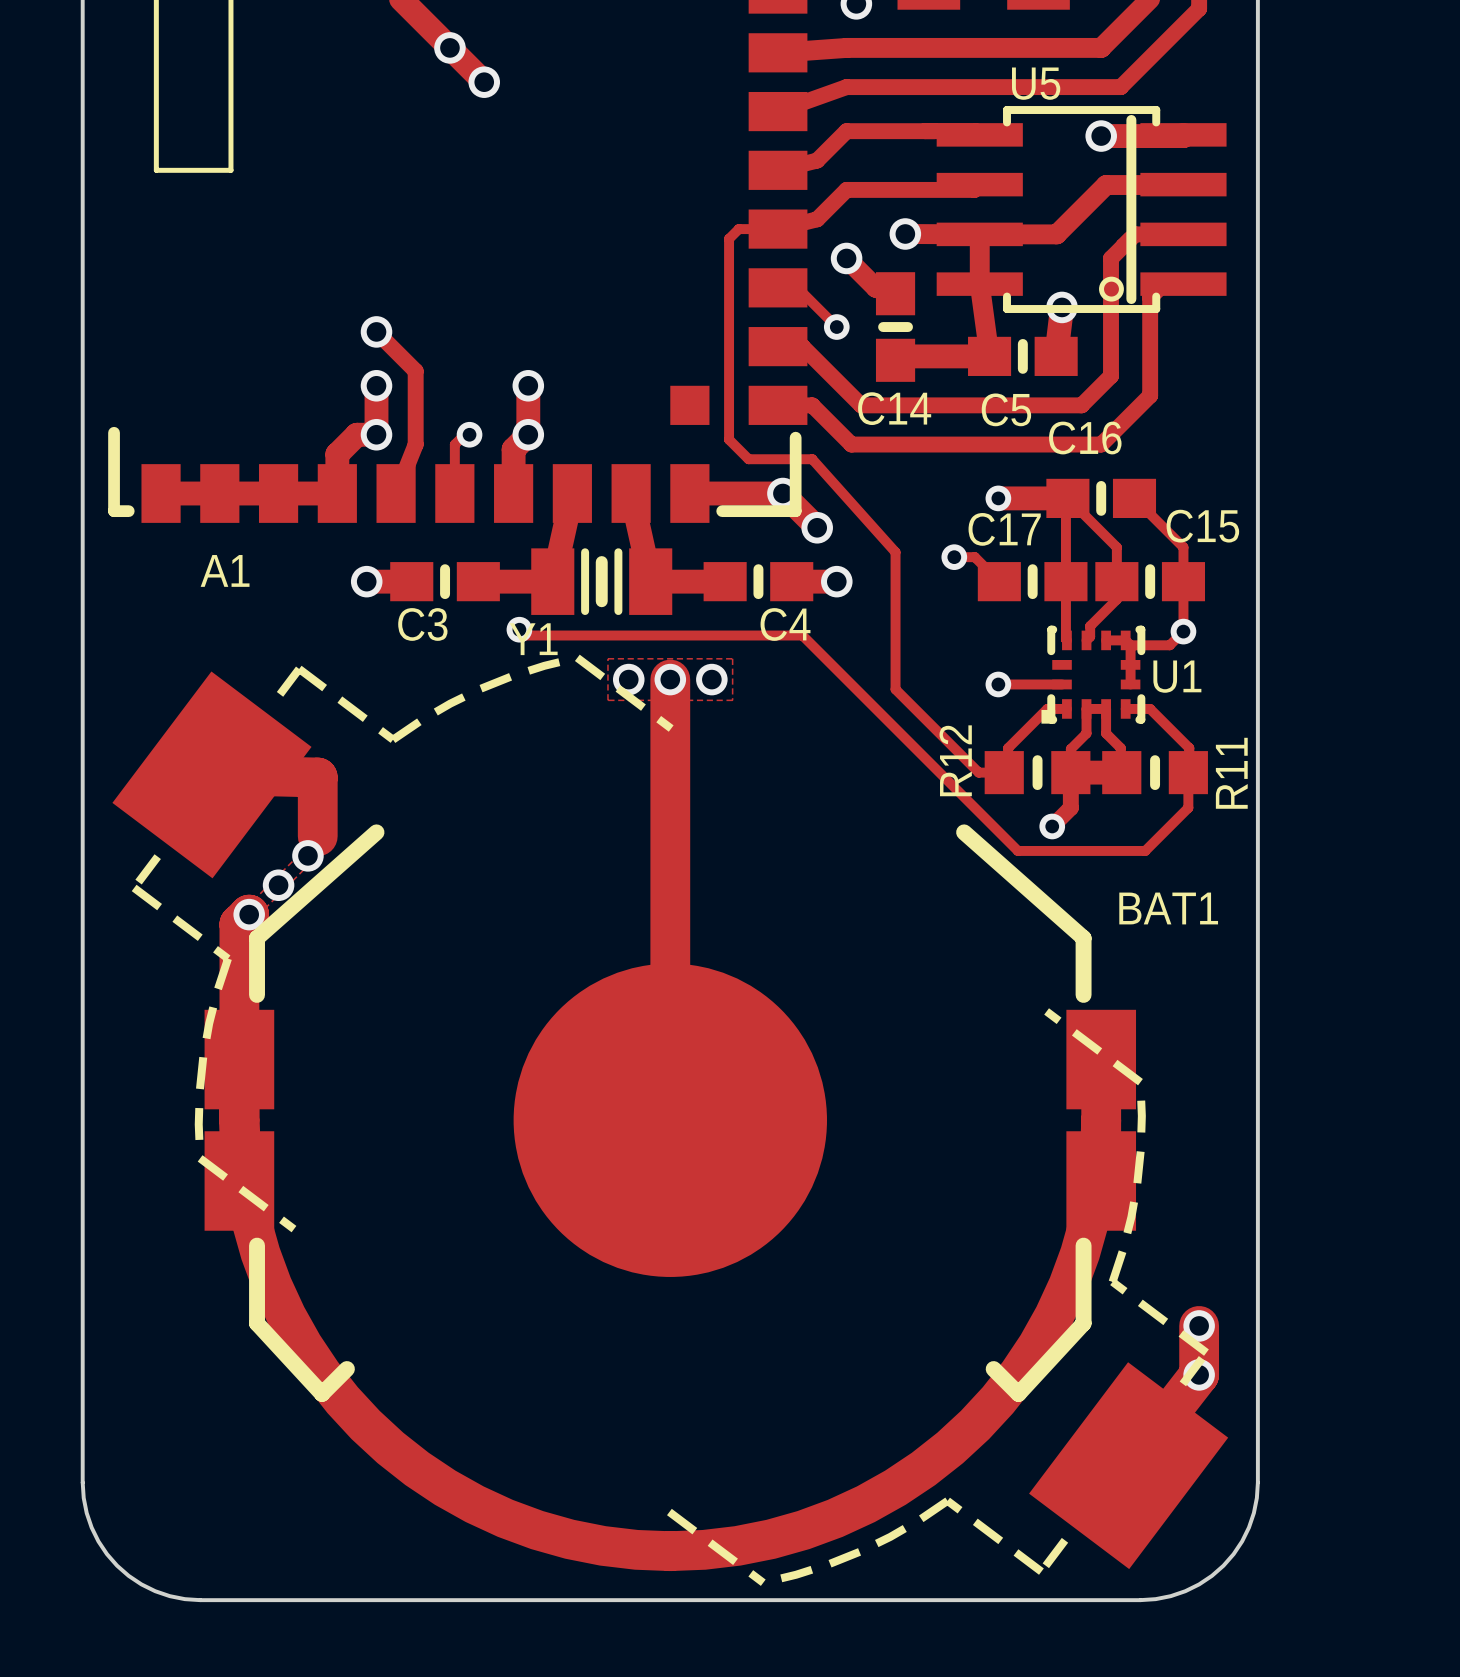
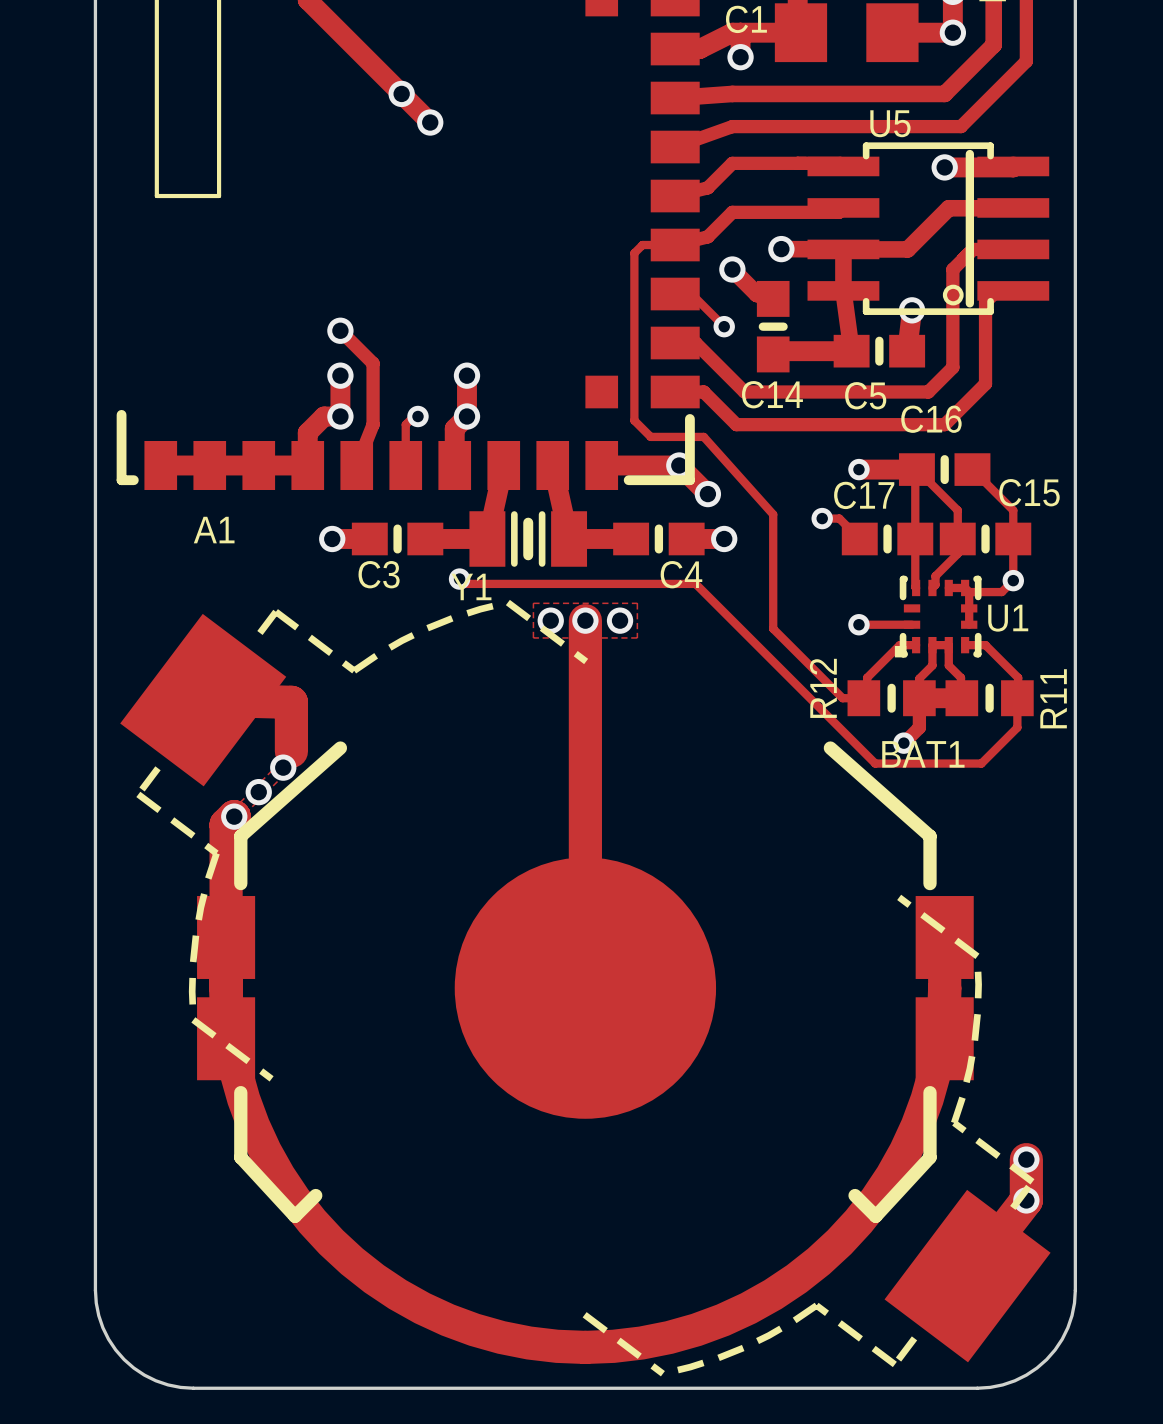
BAT1 name position: BAT1 (1168, 908) -> BAT1 (923, 754)

